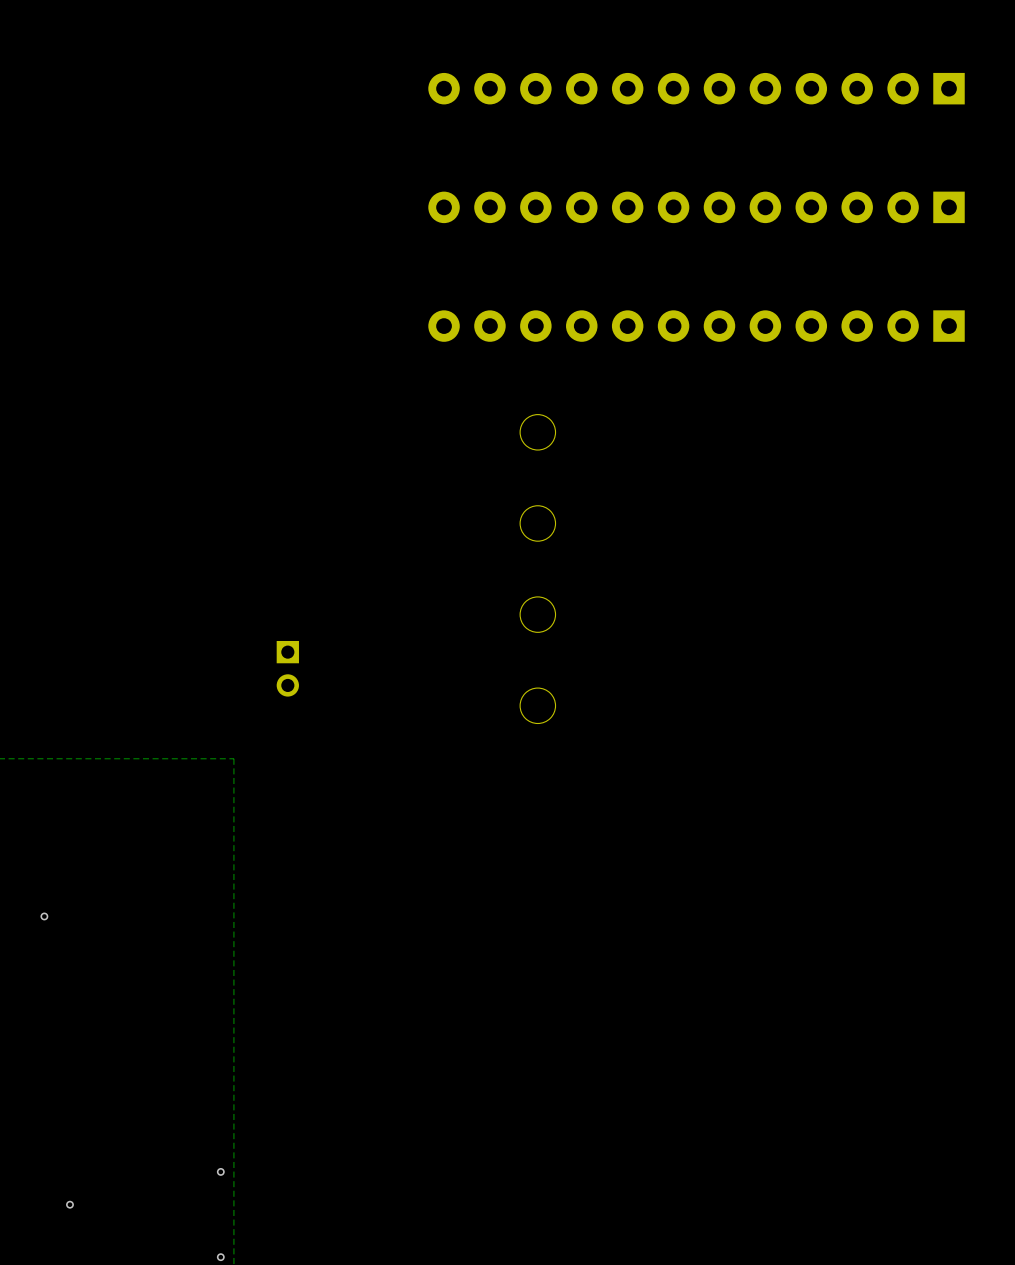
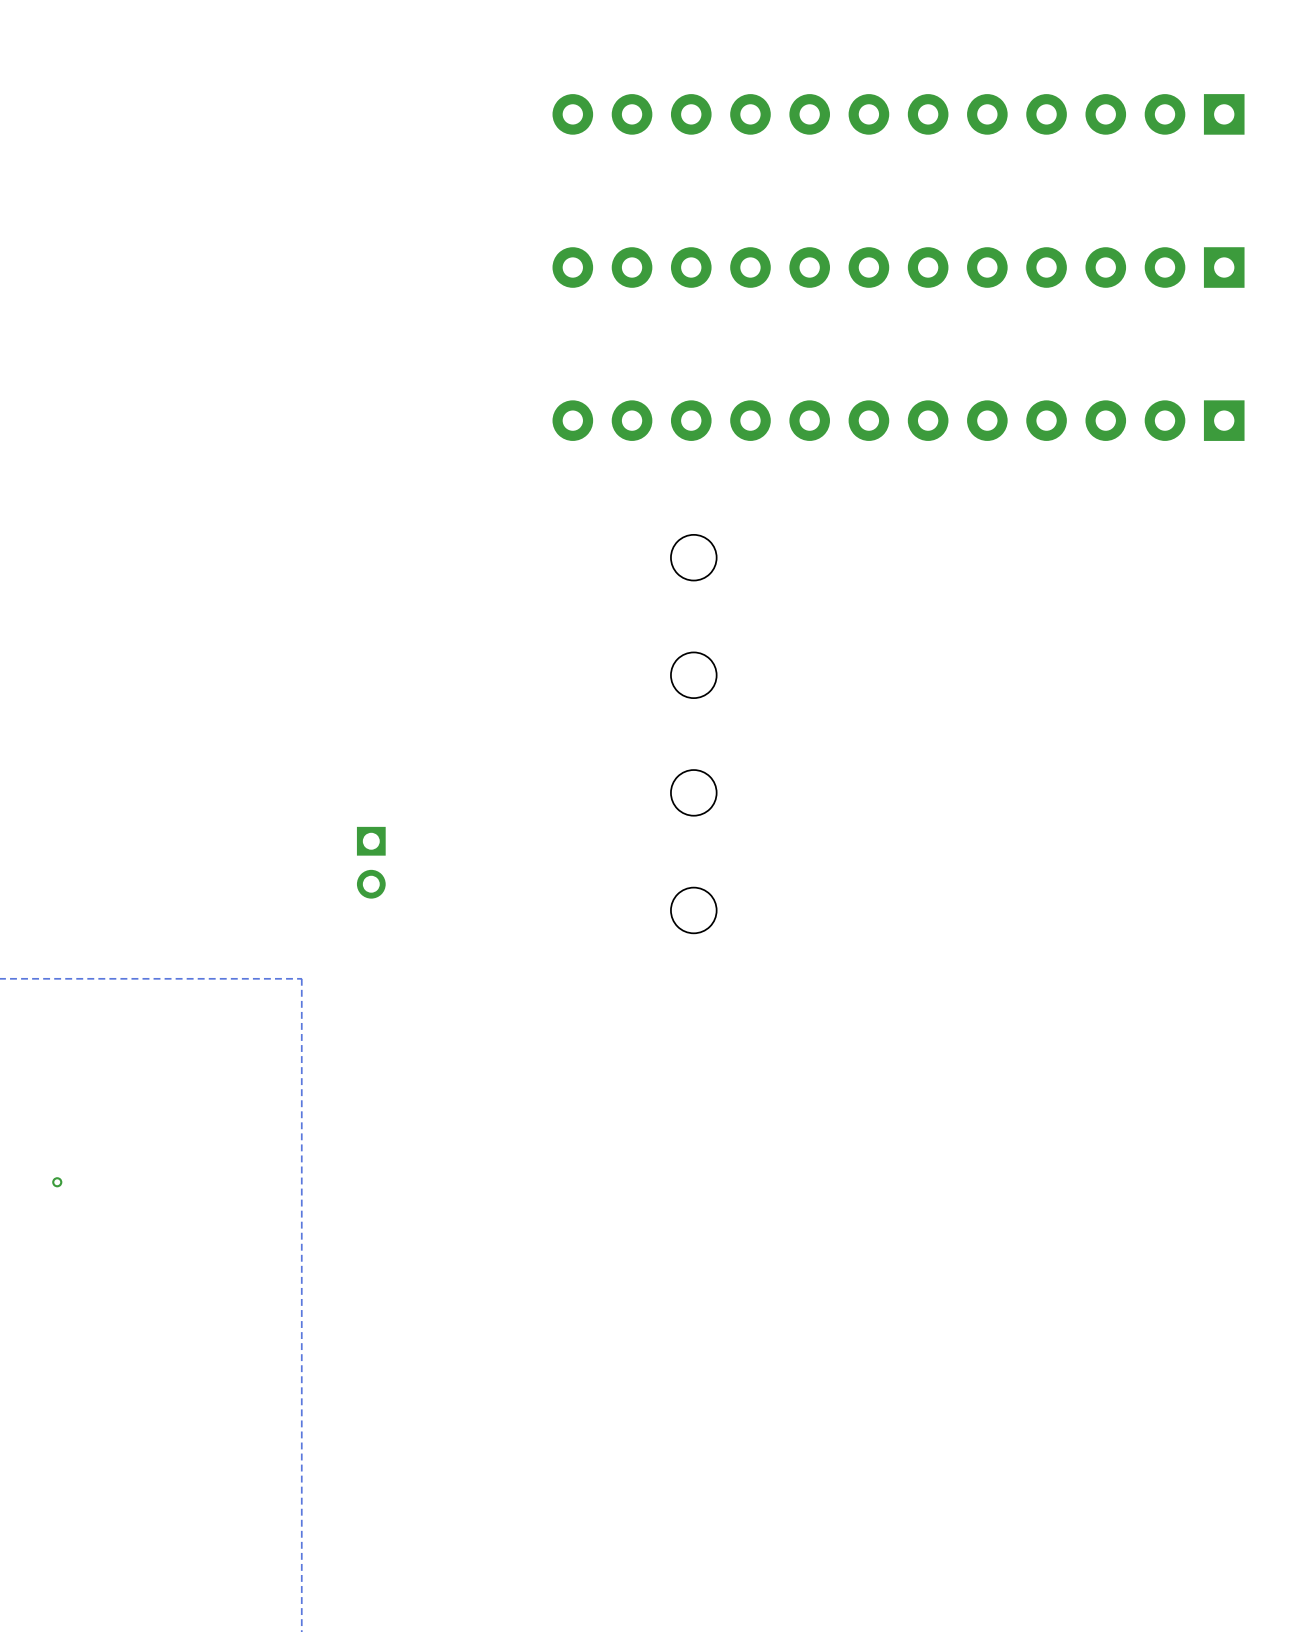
via: (220, 1171) -> none
via: (69, 1204) -> none
via: (220, 1257) -> none

